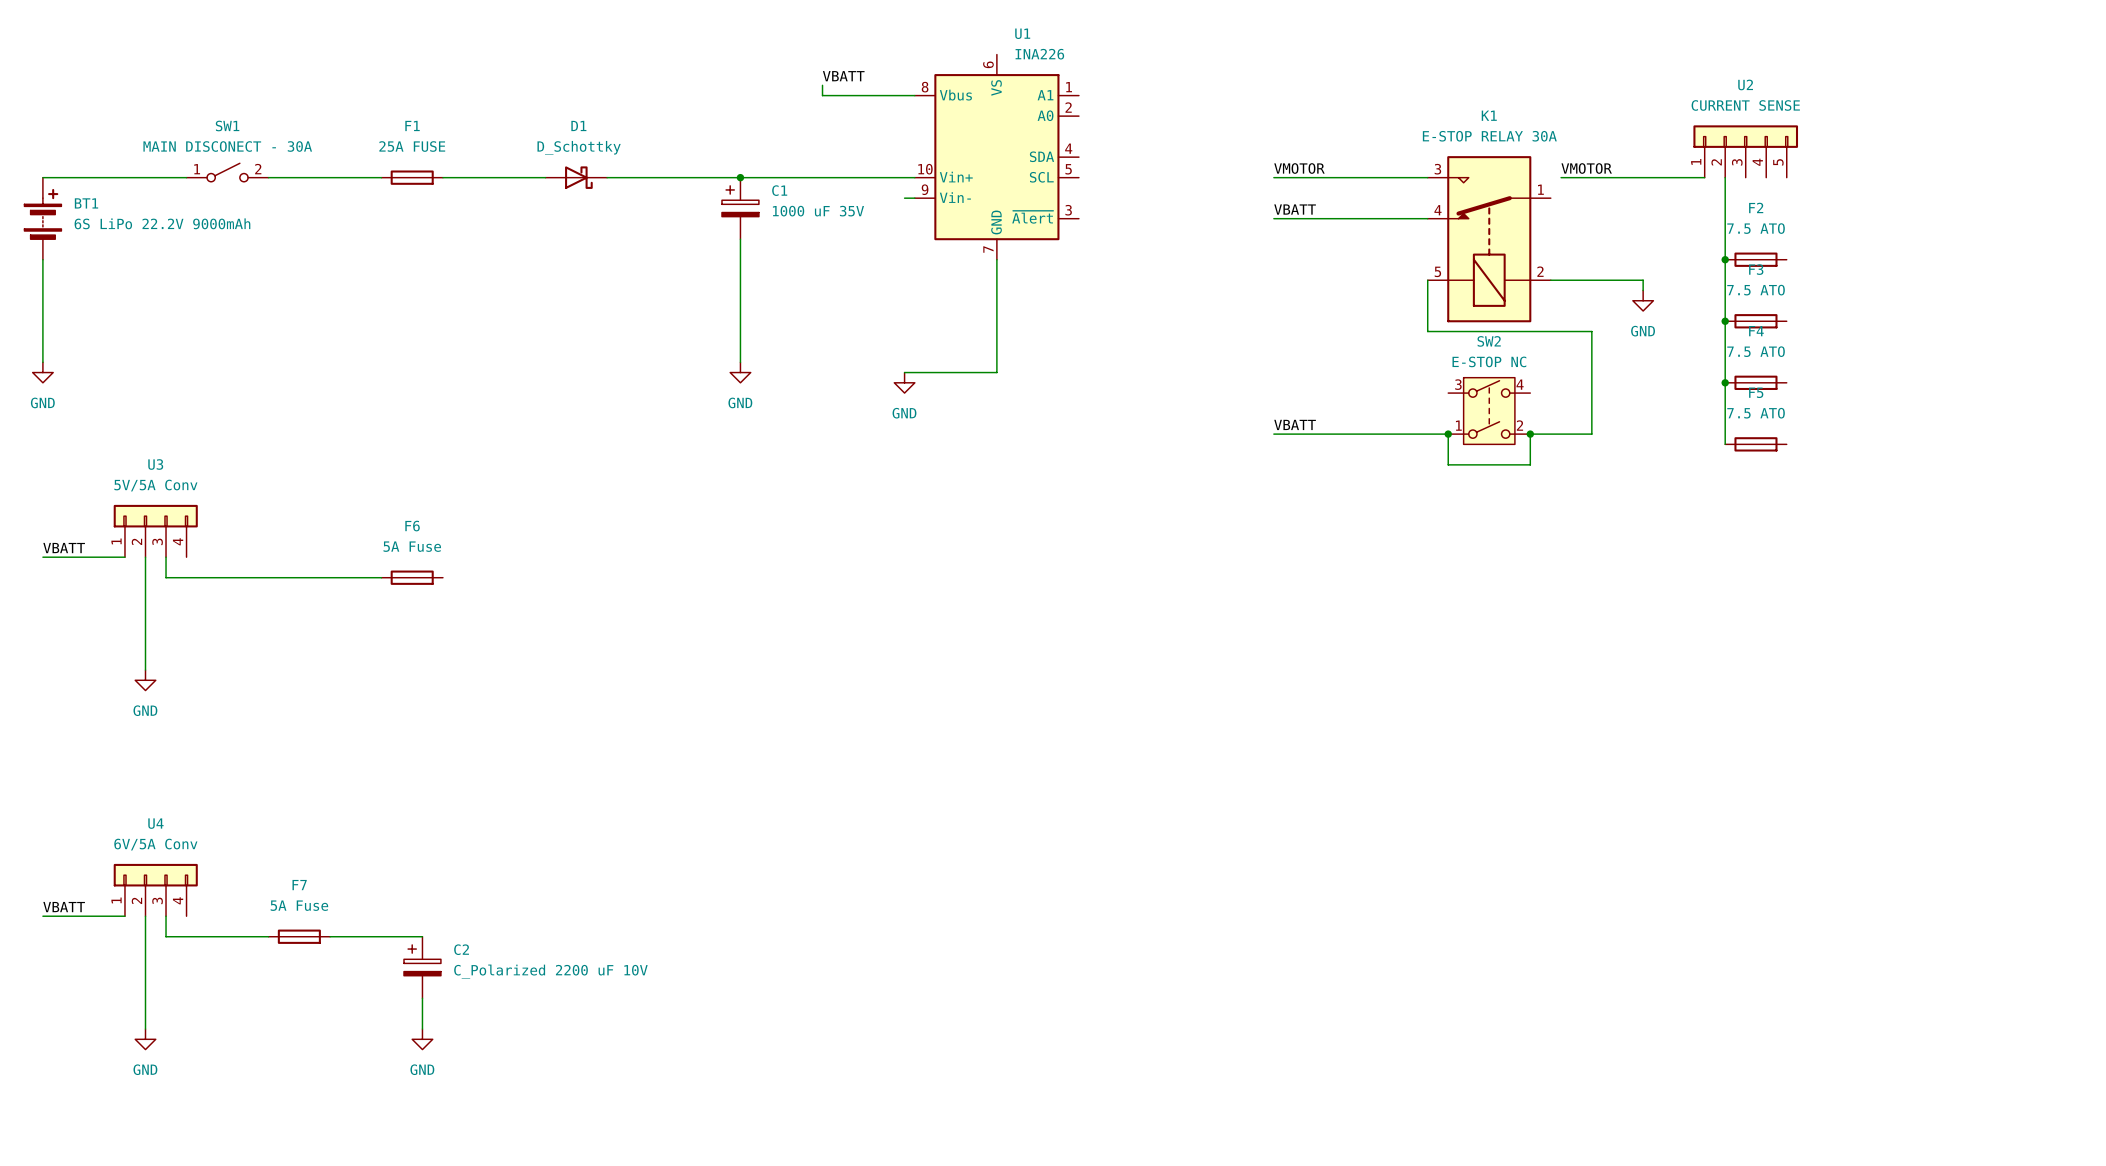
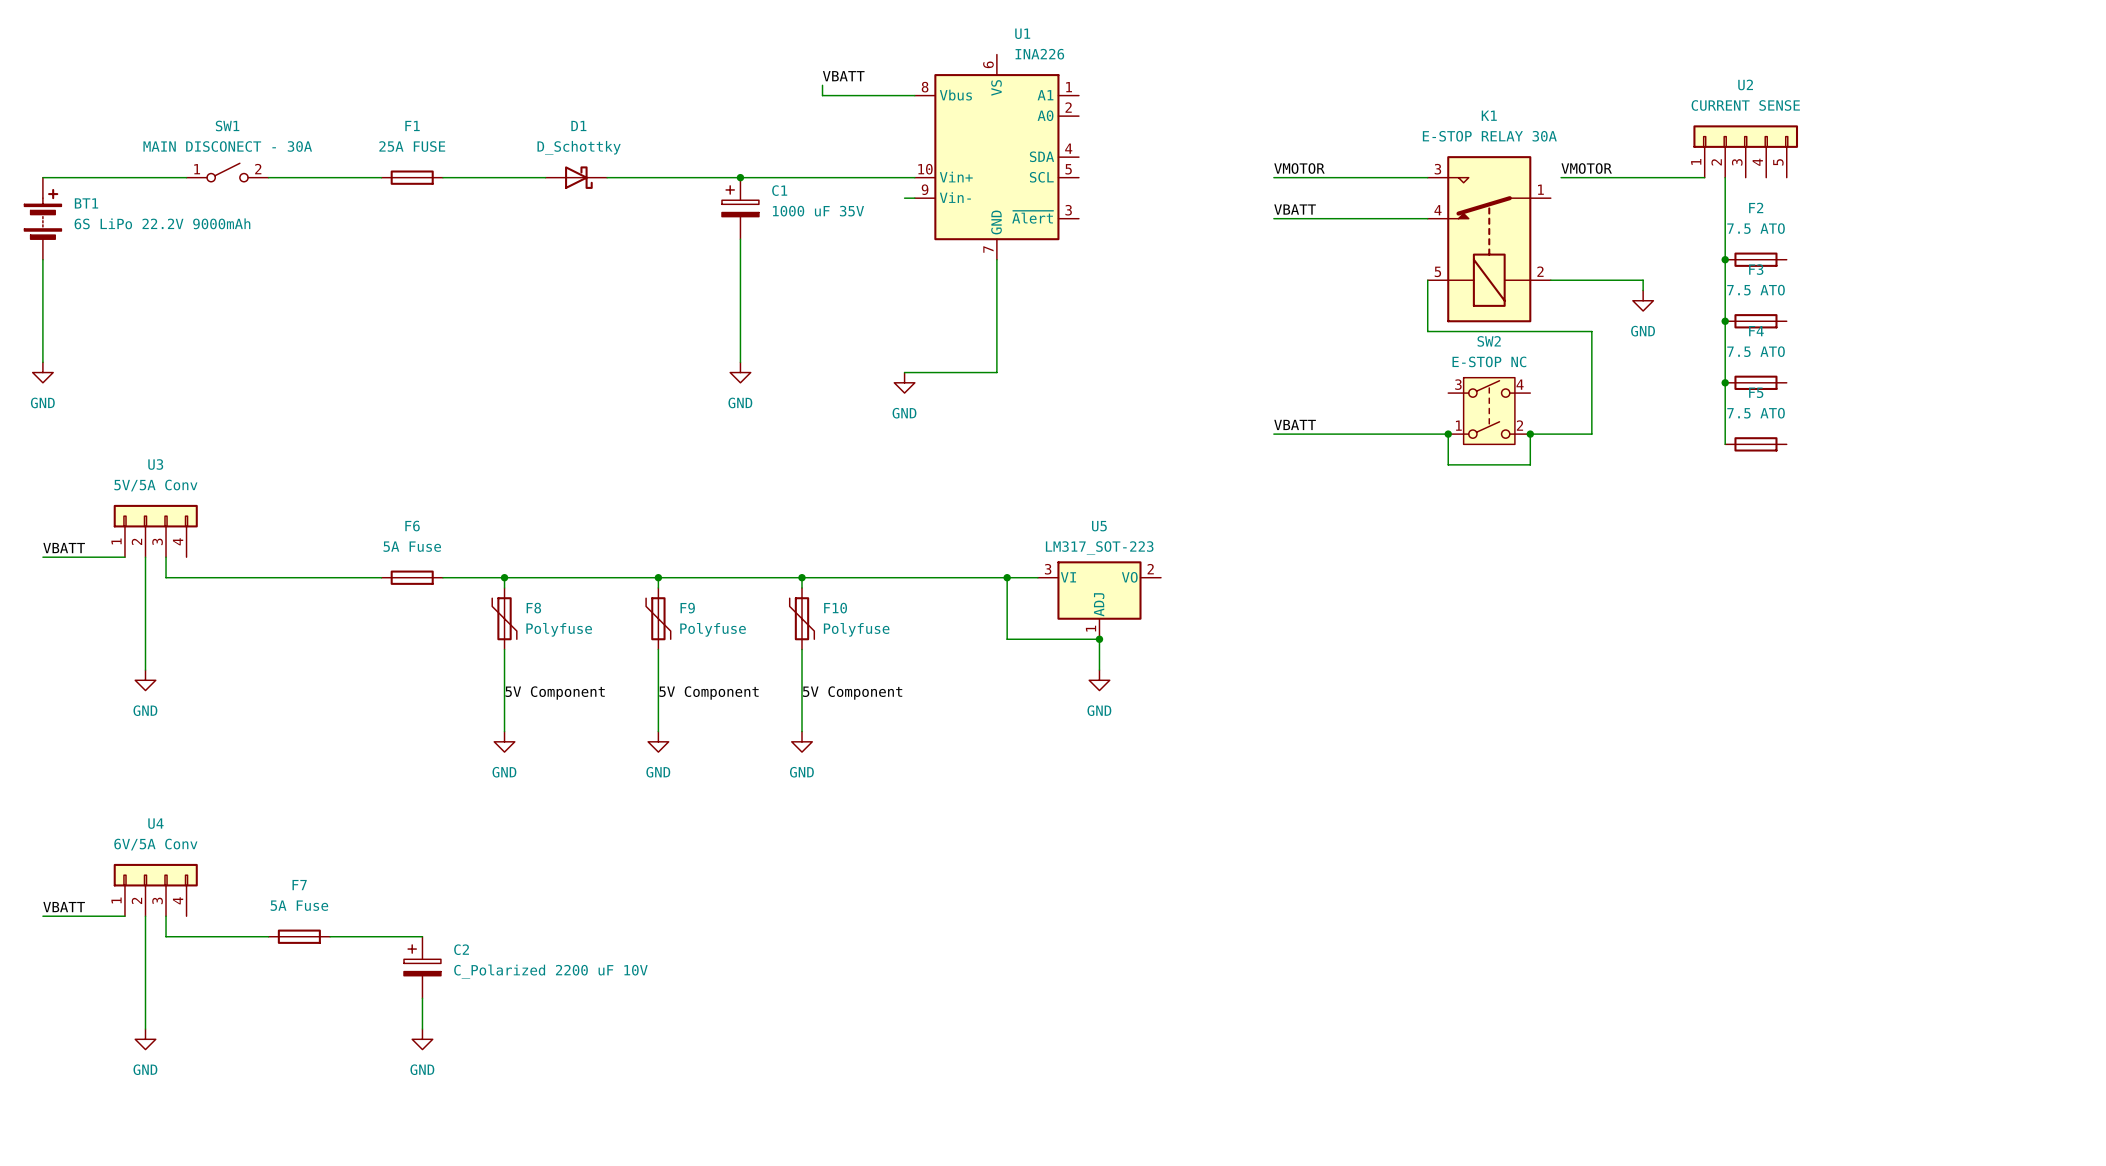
wire: none -> (442, 577) (1037, 577)
wire: none -> (504, 577) (504, 587)
junction: none -> (504, 577)
wire: none -> (658, 577) (658, 587)
junction: none -> (658, 577)
wire: none -> (802, 577) (802, 587)
junction: none -> (802, 577)
wire: none -> (1007, 577) (1007, 639) (1099, 639) (1099, 670)
junction: none -> (1007, 577)
U5: none -> LM317_SOT-223 (1099, 600)
F8: none -> Polyfuse (504, 618)
F9: none -> Polyfuse (658, 618)
F10: none -> Polyfuse (802, 618)
junction: none -> (1099, 639)
wire: none -> (504, 649) (504, 731)
wire: none -> (658, 649) (658, 731)
wire: none -> (802, 649) (802, 731)
power symbol: none -> GND (1099, 680)
label: none -> 5V Component (555, 693)
label: none -> 5V Component (709, 693)
label: none -> 5V Component (852, 693)
power symbol: none -> GND (504, 741)
power symbol: none -> GND (658, 741)
power symbol: none -> GND (802, 741)

